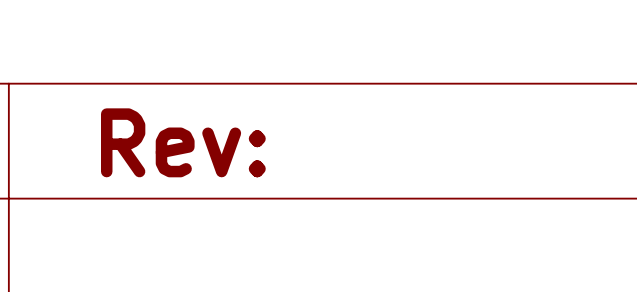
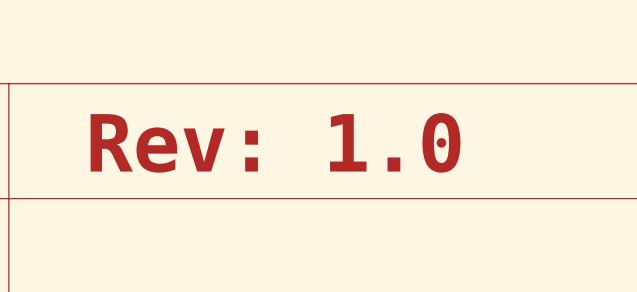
title block: Rev: (183, 142) -> Rev: 1.0 (275, 142)

